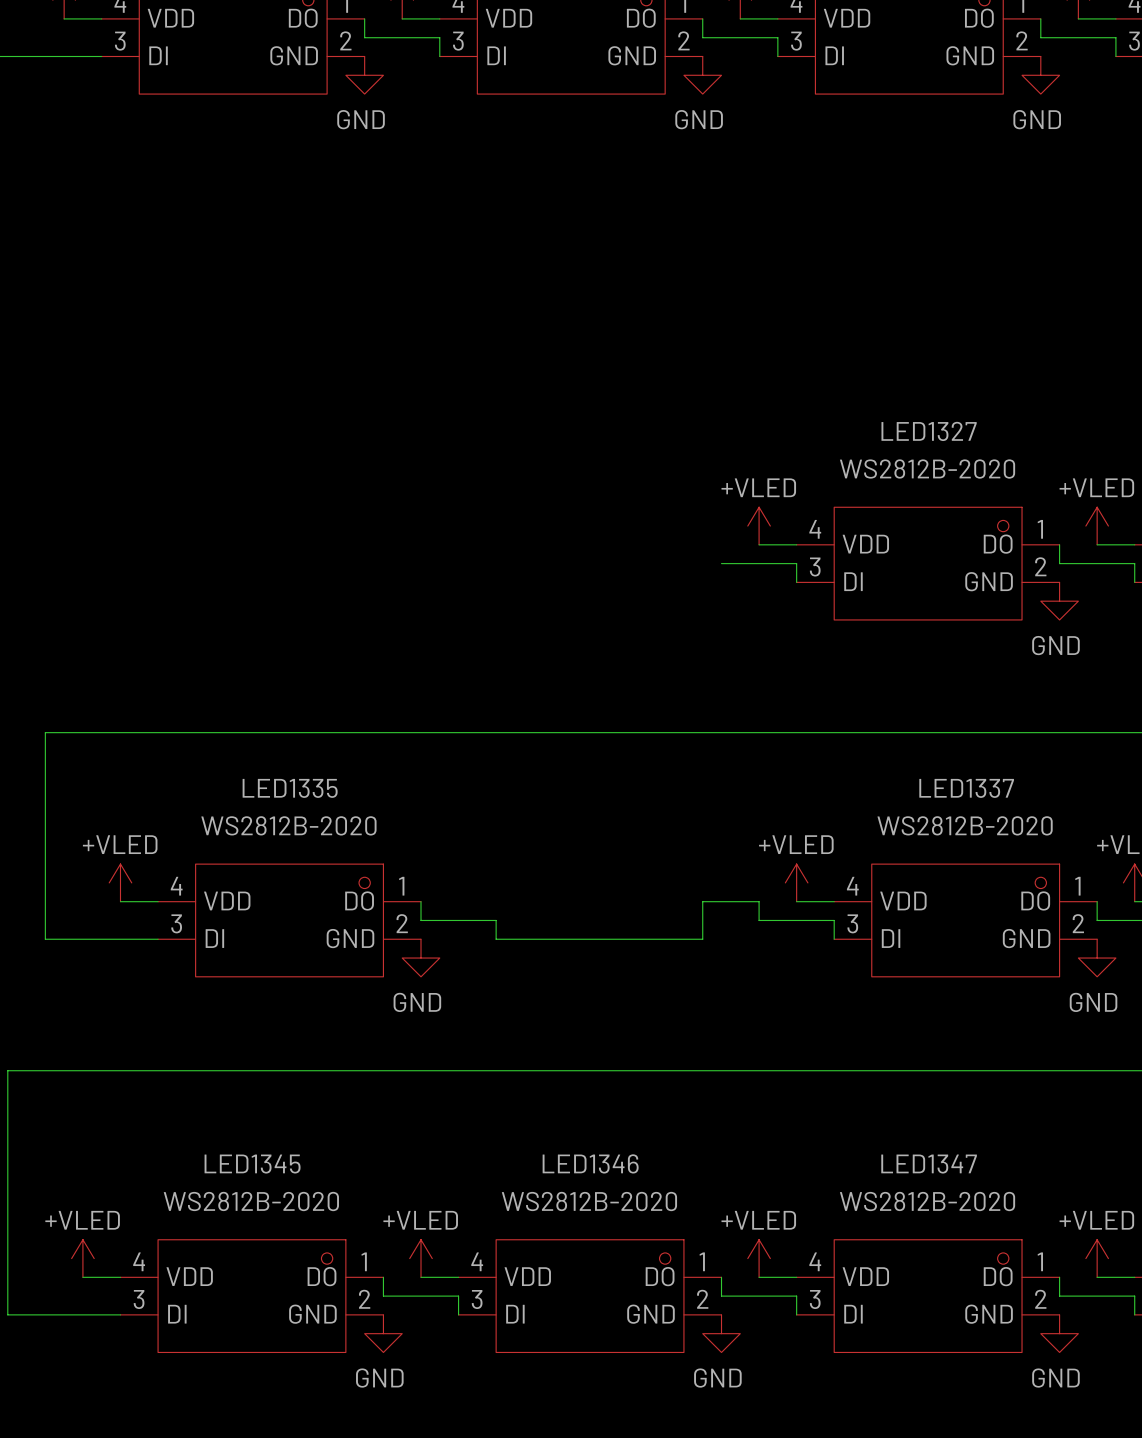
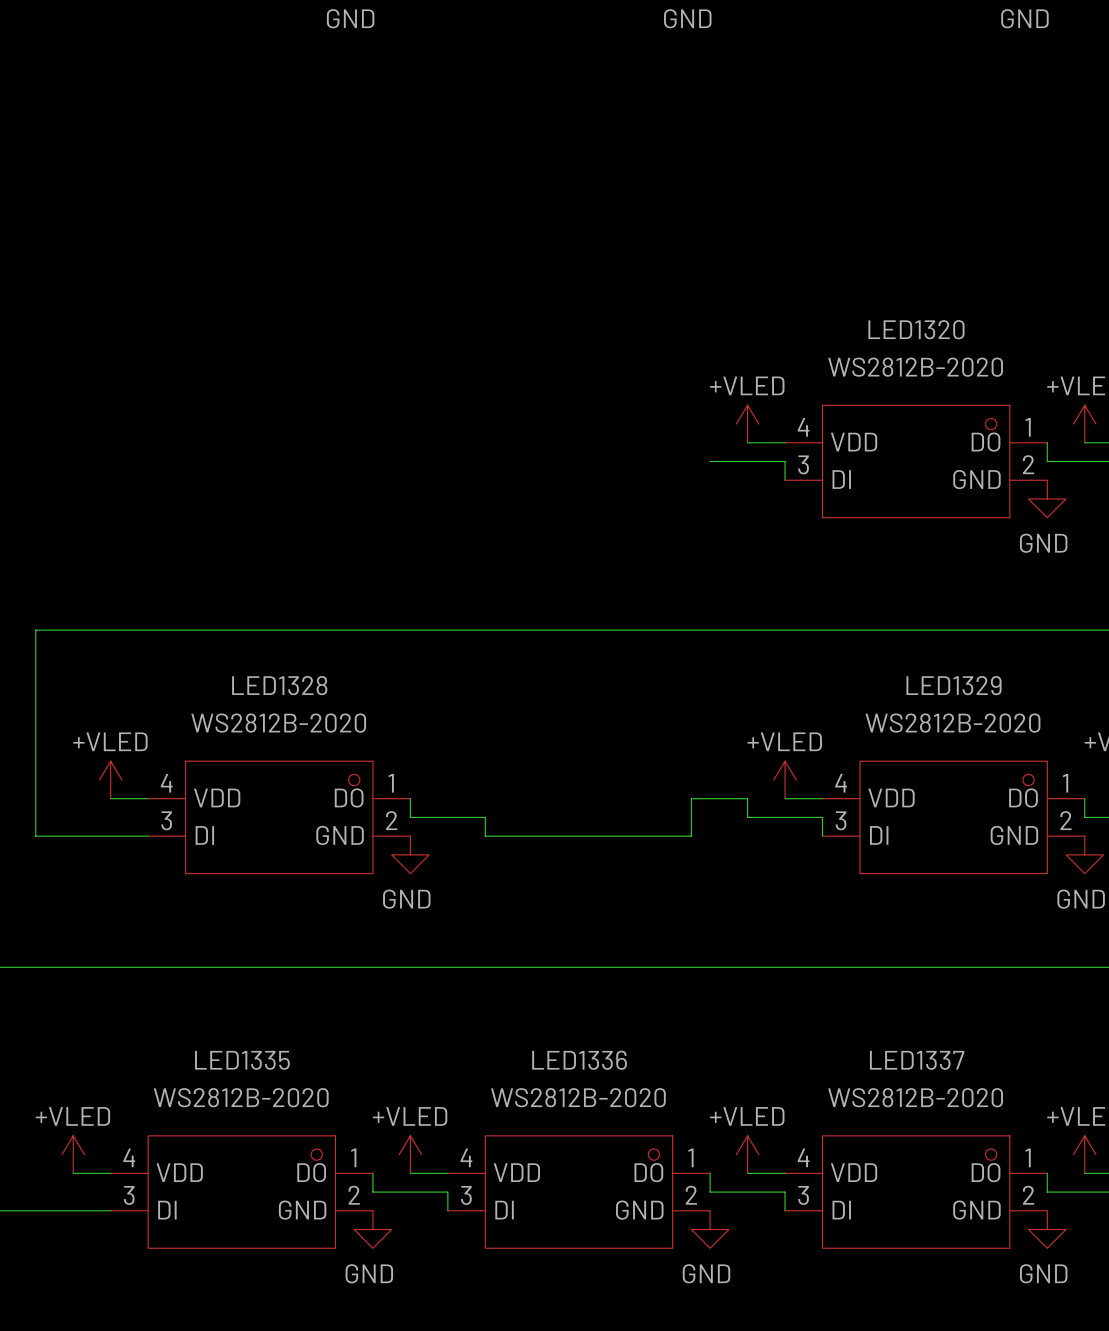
LED1327 name: LED1327 (929, 431) -> LED1320 (916, 329)
LED1335 name: LED1335 (290, 788) -> LED1328 (279, 685)
LED1337 name: LED1337 (966, 788) -> LED1329 (954, 685)
LED1346 name: LED1346 (590, 1163) -> LED1336 (579, 1060)
LED1345 name: LED1345 (252, 1164) -> LED1335 (242, 1060)
LED1347 name: LED1347 (929, 1164) -> LED1337 (917, 1060)

